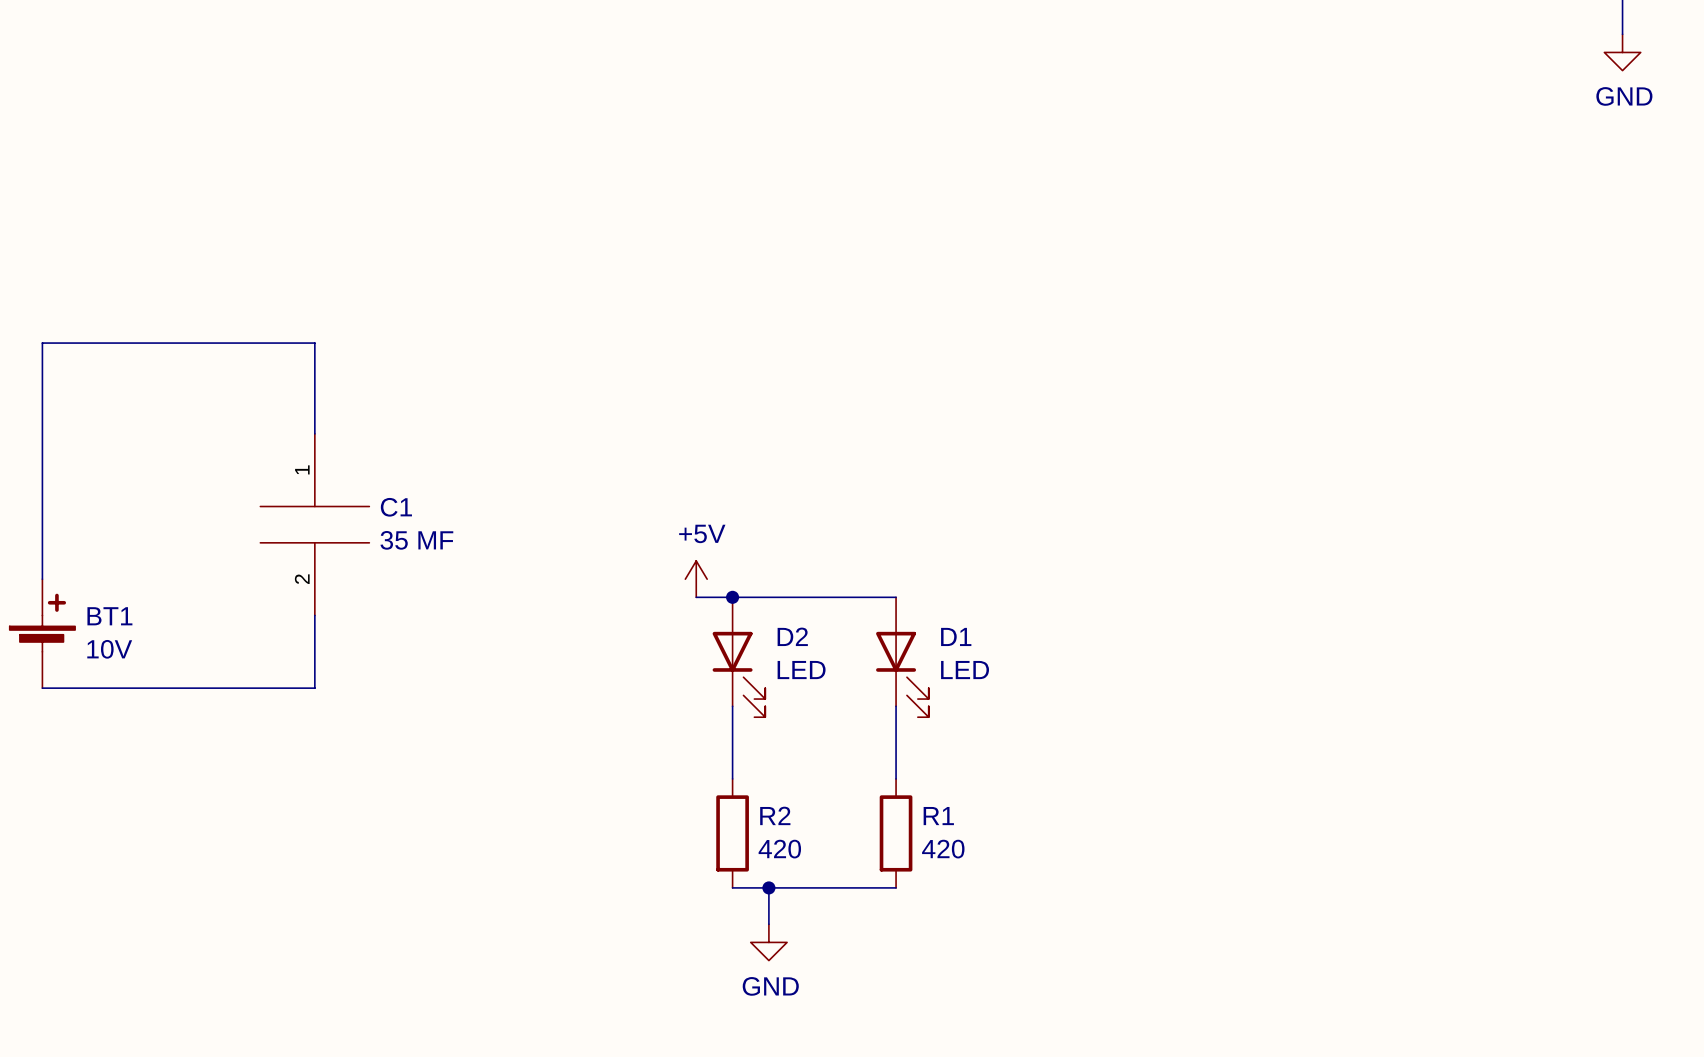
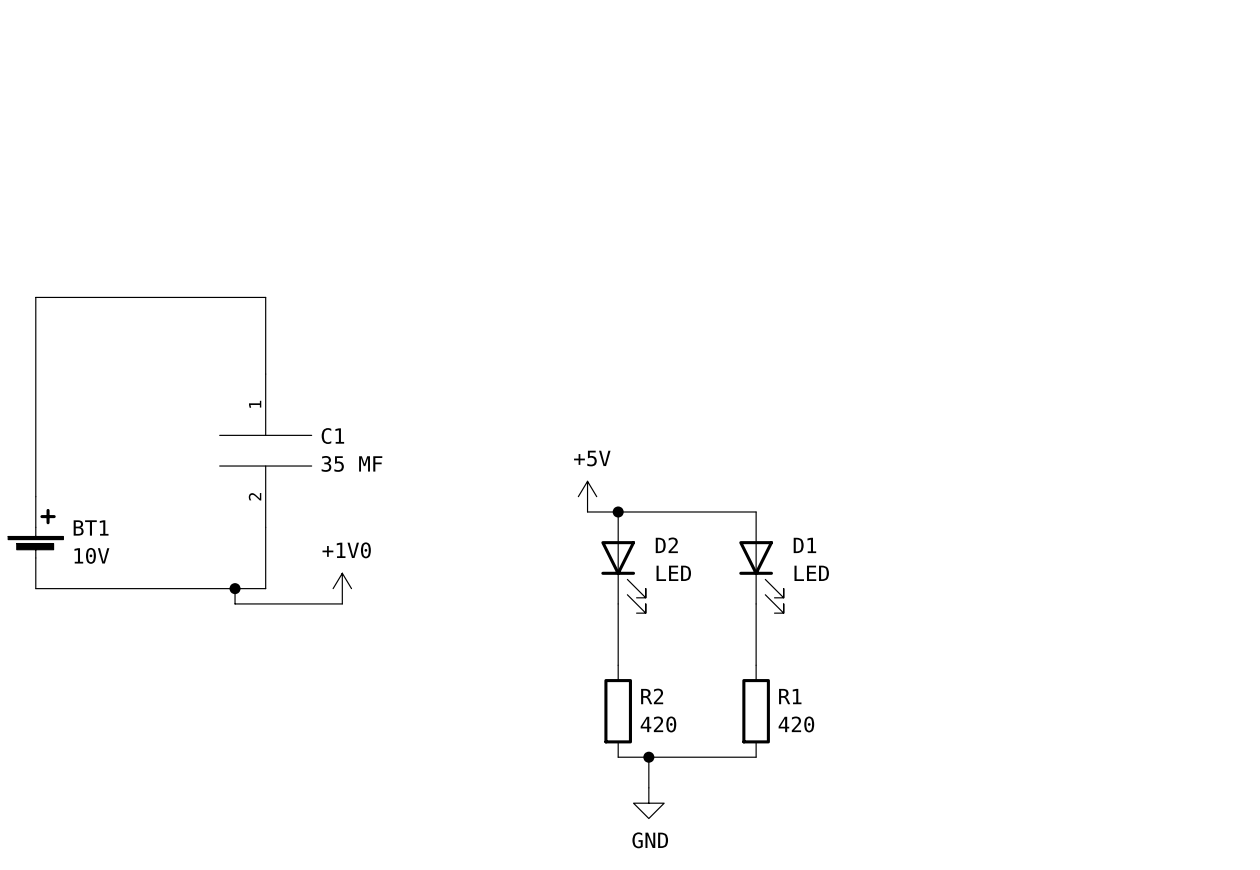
wire: none -> (235, 588) (235, 603) (342, 603)
junction: none -> (235, 588)
power symbol: none -> +1V0 (342, 588)

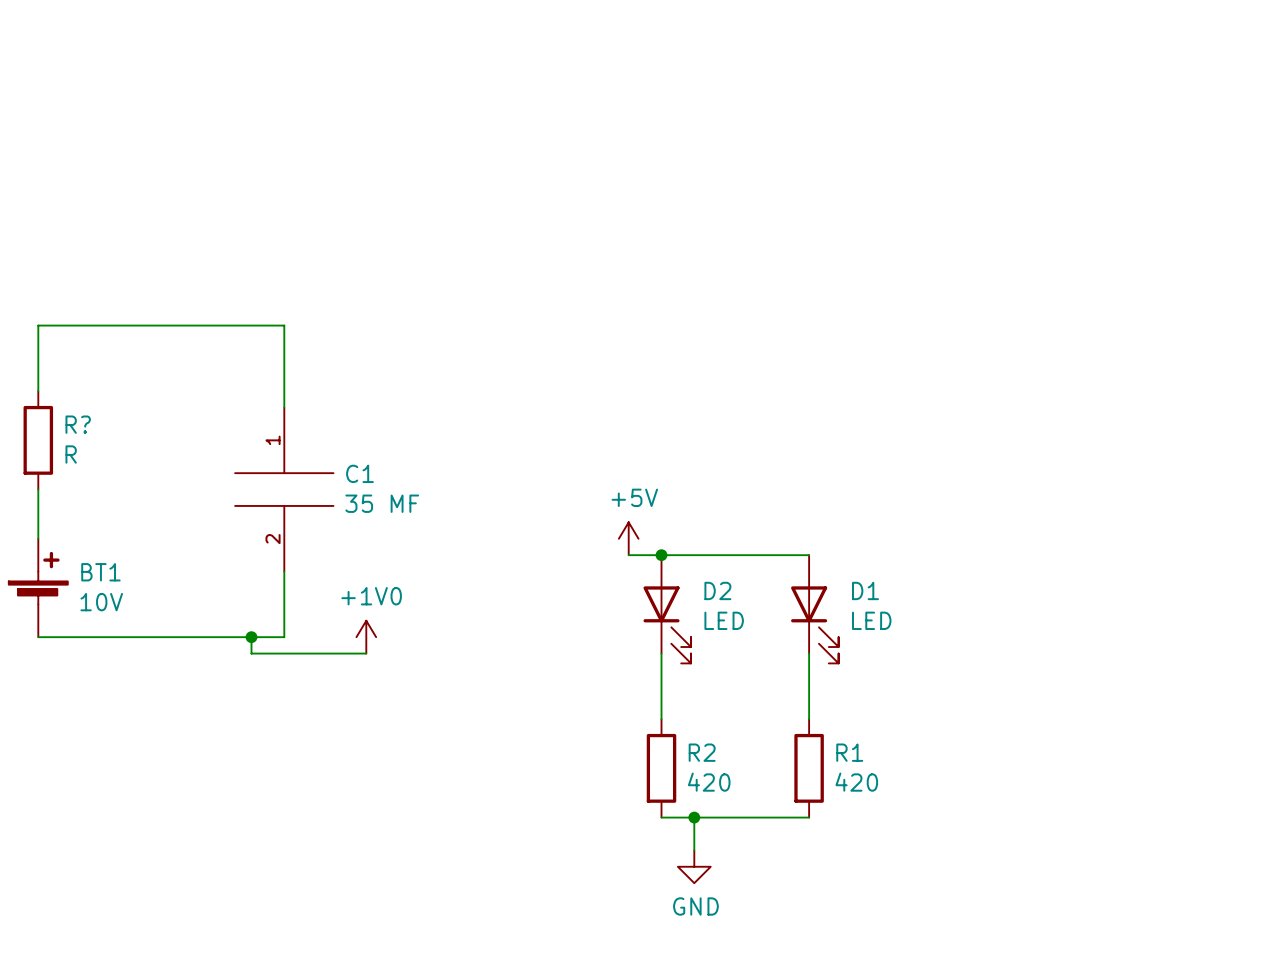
wire: (35, 358) (35, 450) -> none
R?: none -> R (38, 440)

